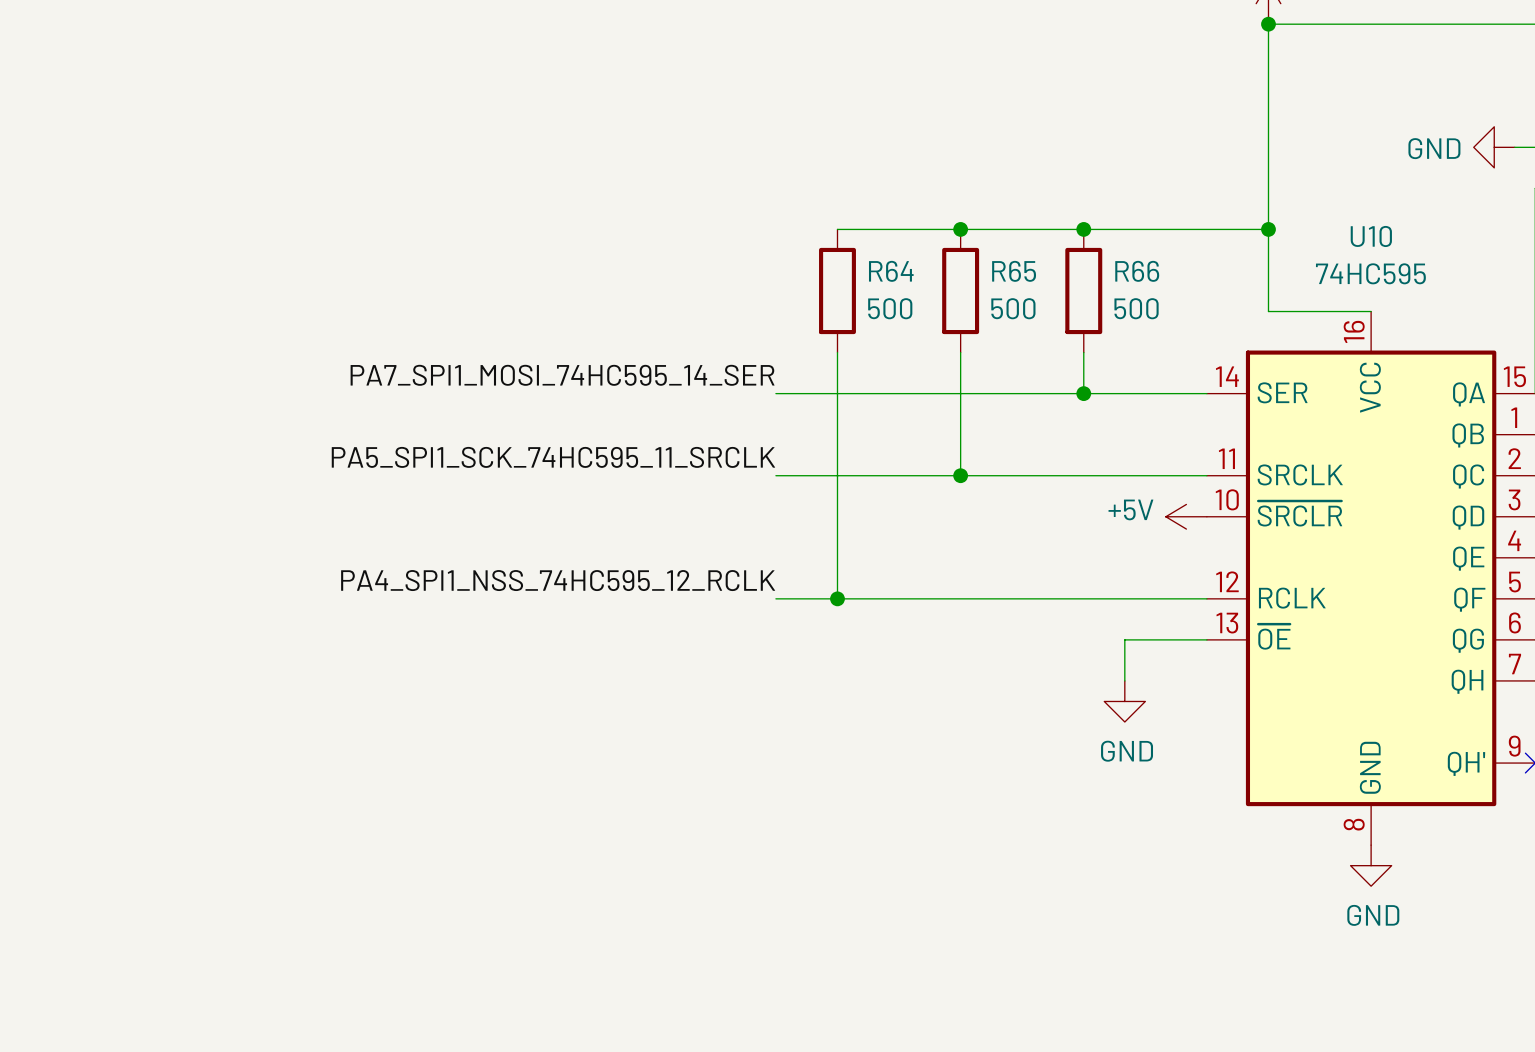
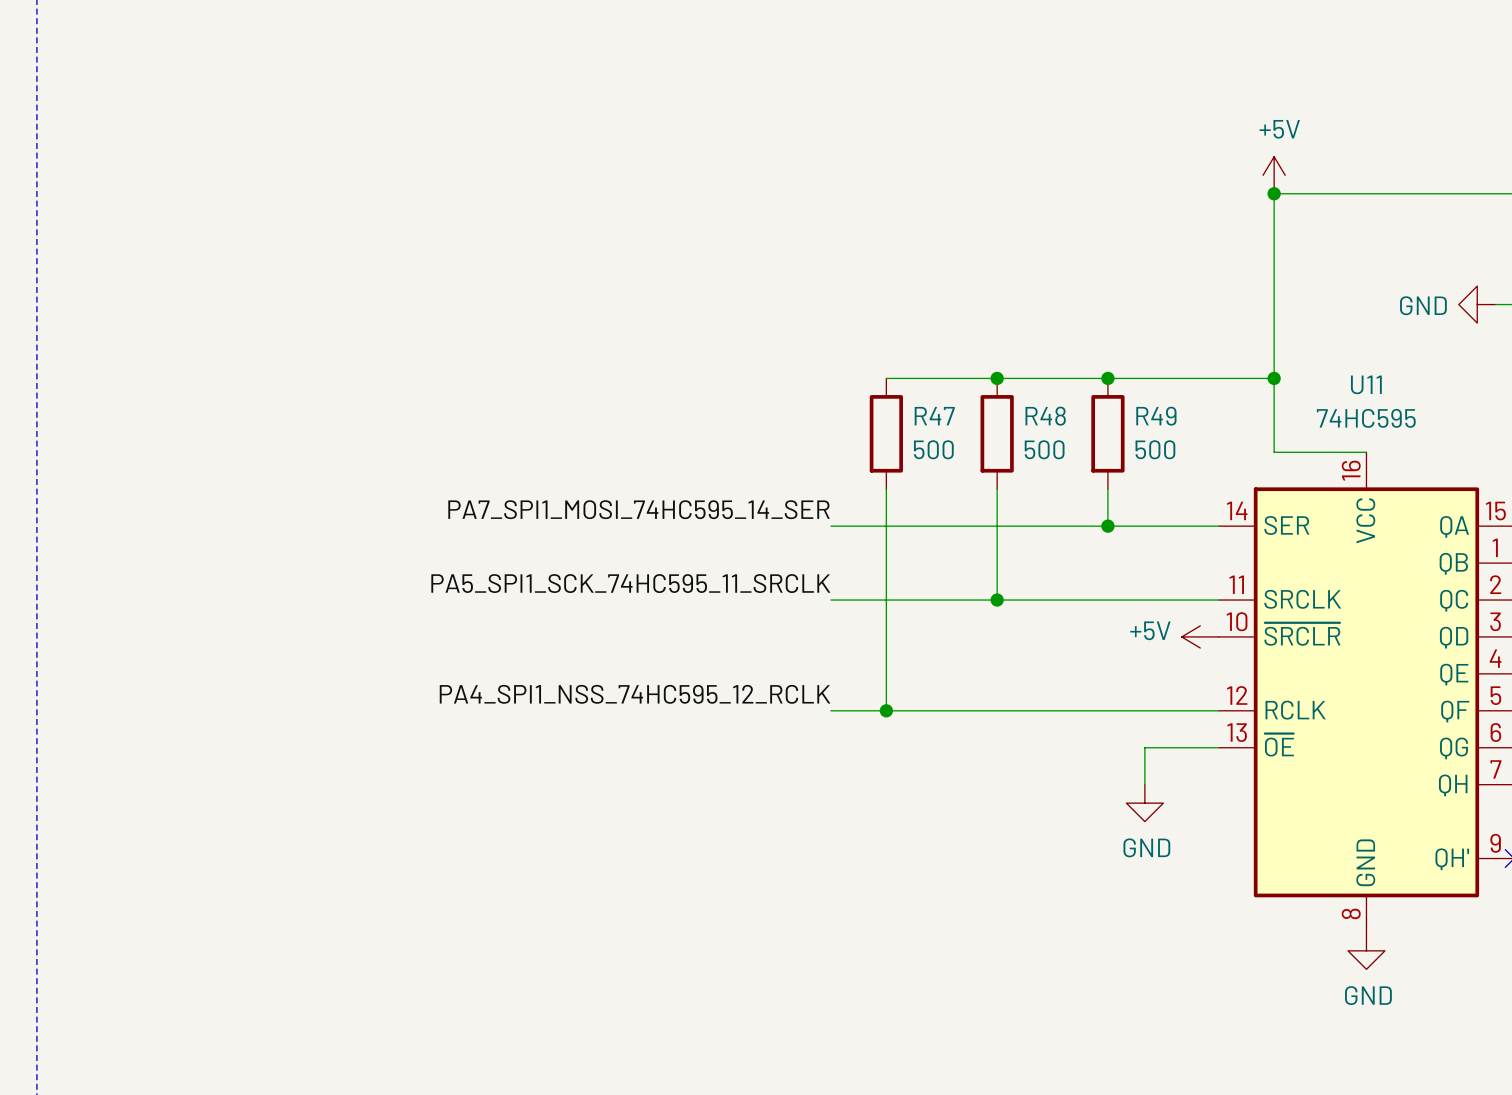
U10 name: U10 (1371, 236) -> U11 (1366, 384)
R64 name: R64 (891, 271) -> R47 (934, 416)
R65 name: R65 (1014, 271) -> R48 (1045, 416)
R66 name: R66 (1137, 271) -> R49 (1156, 416)

